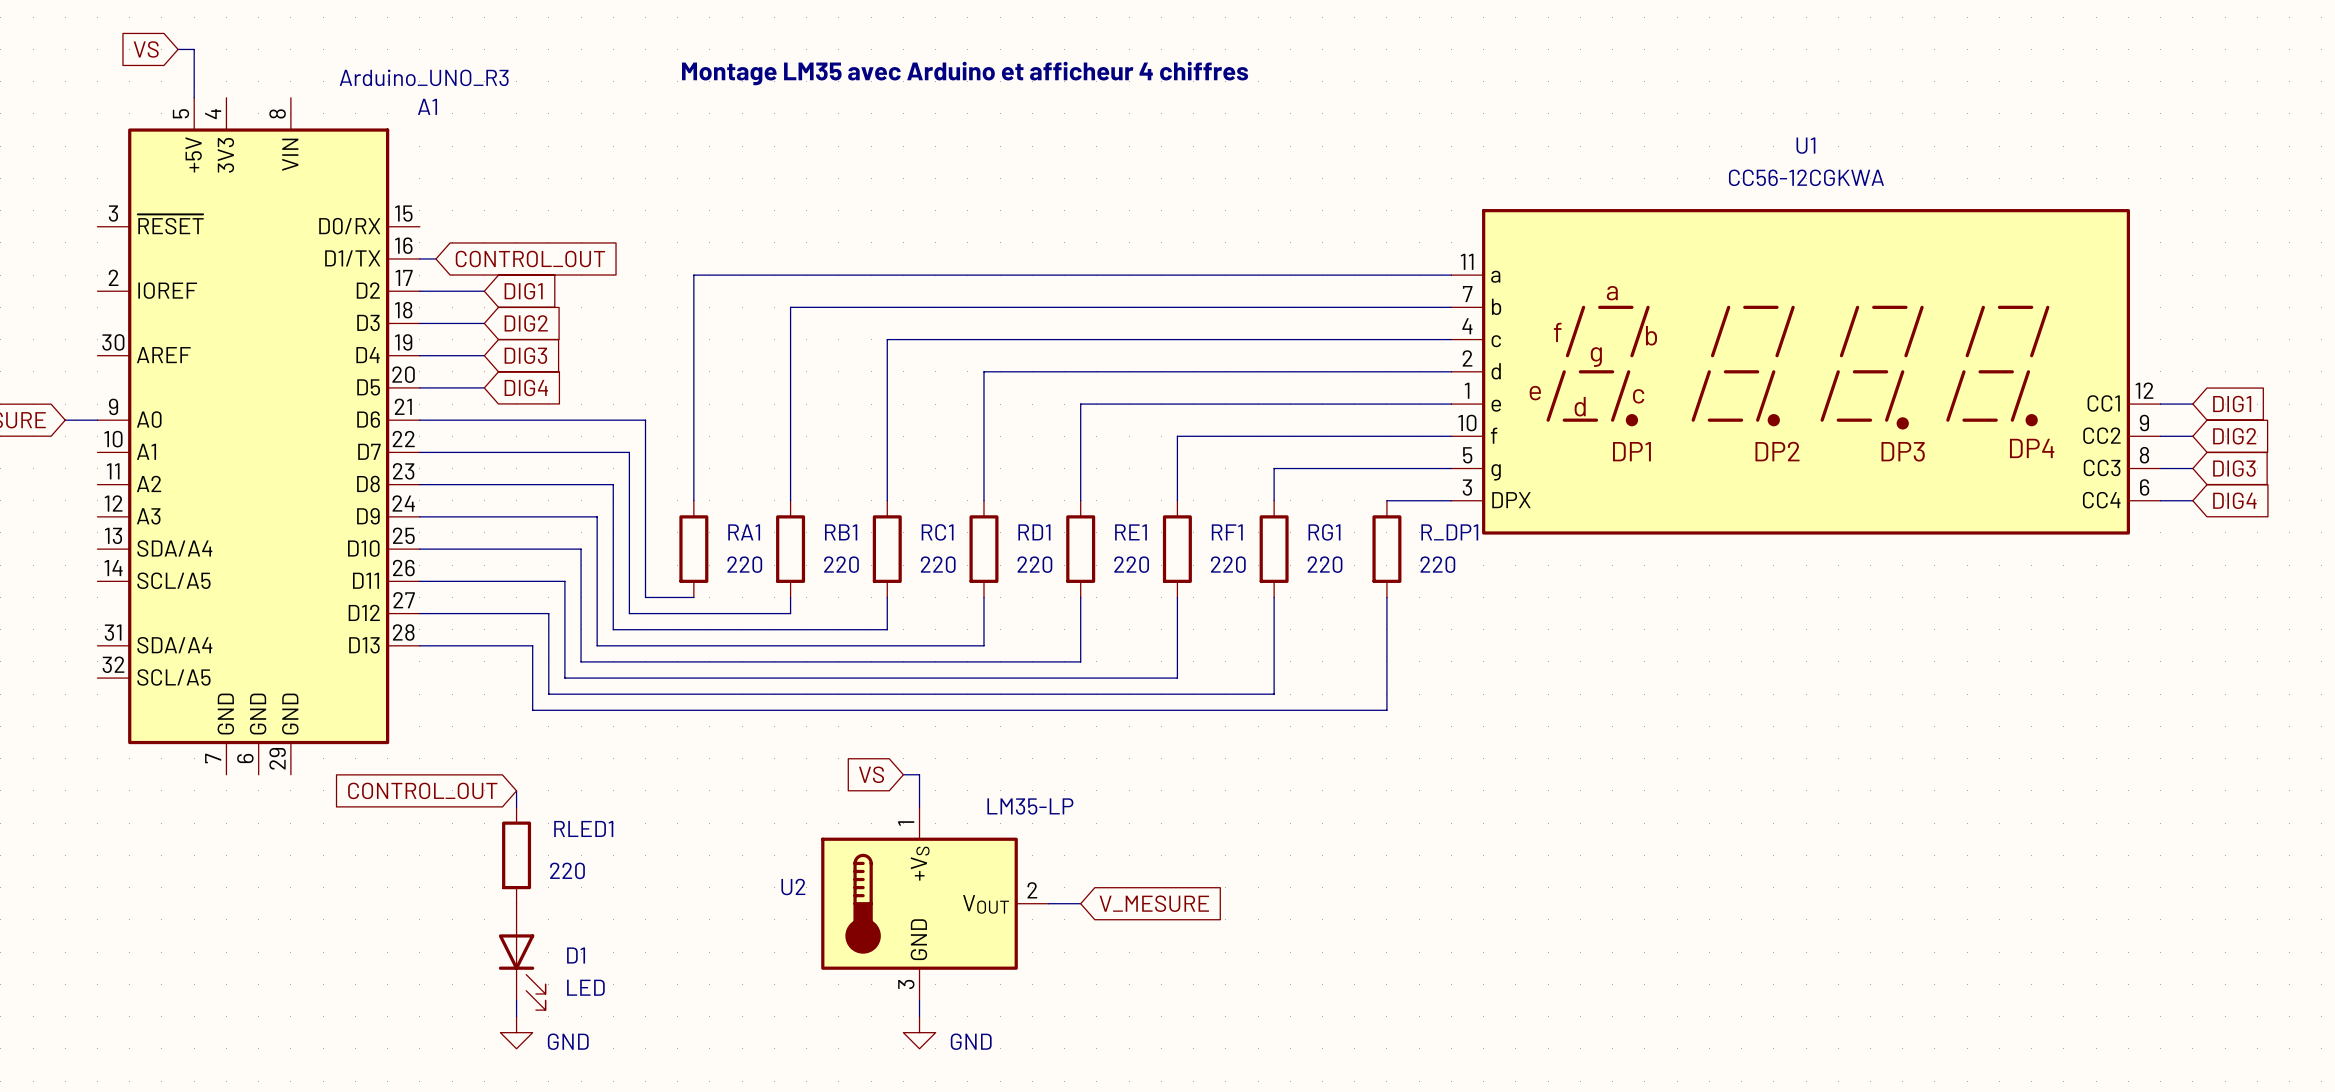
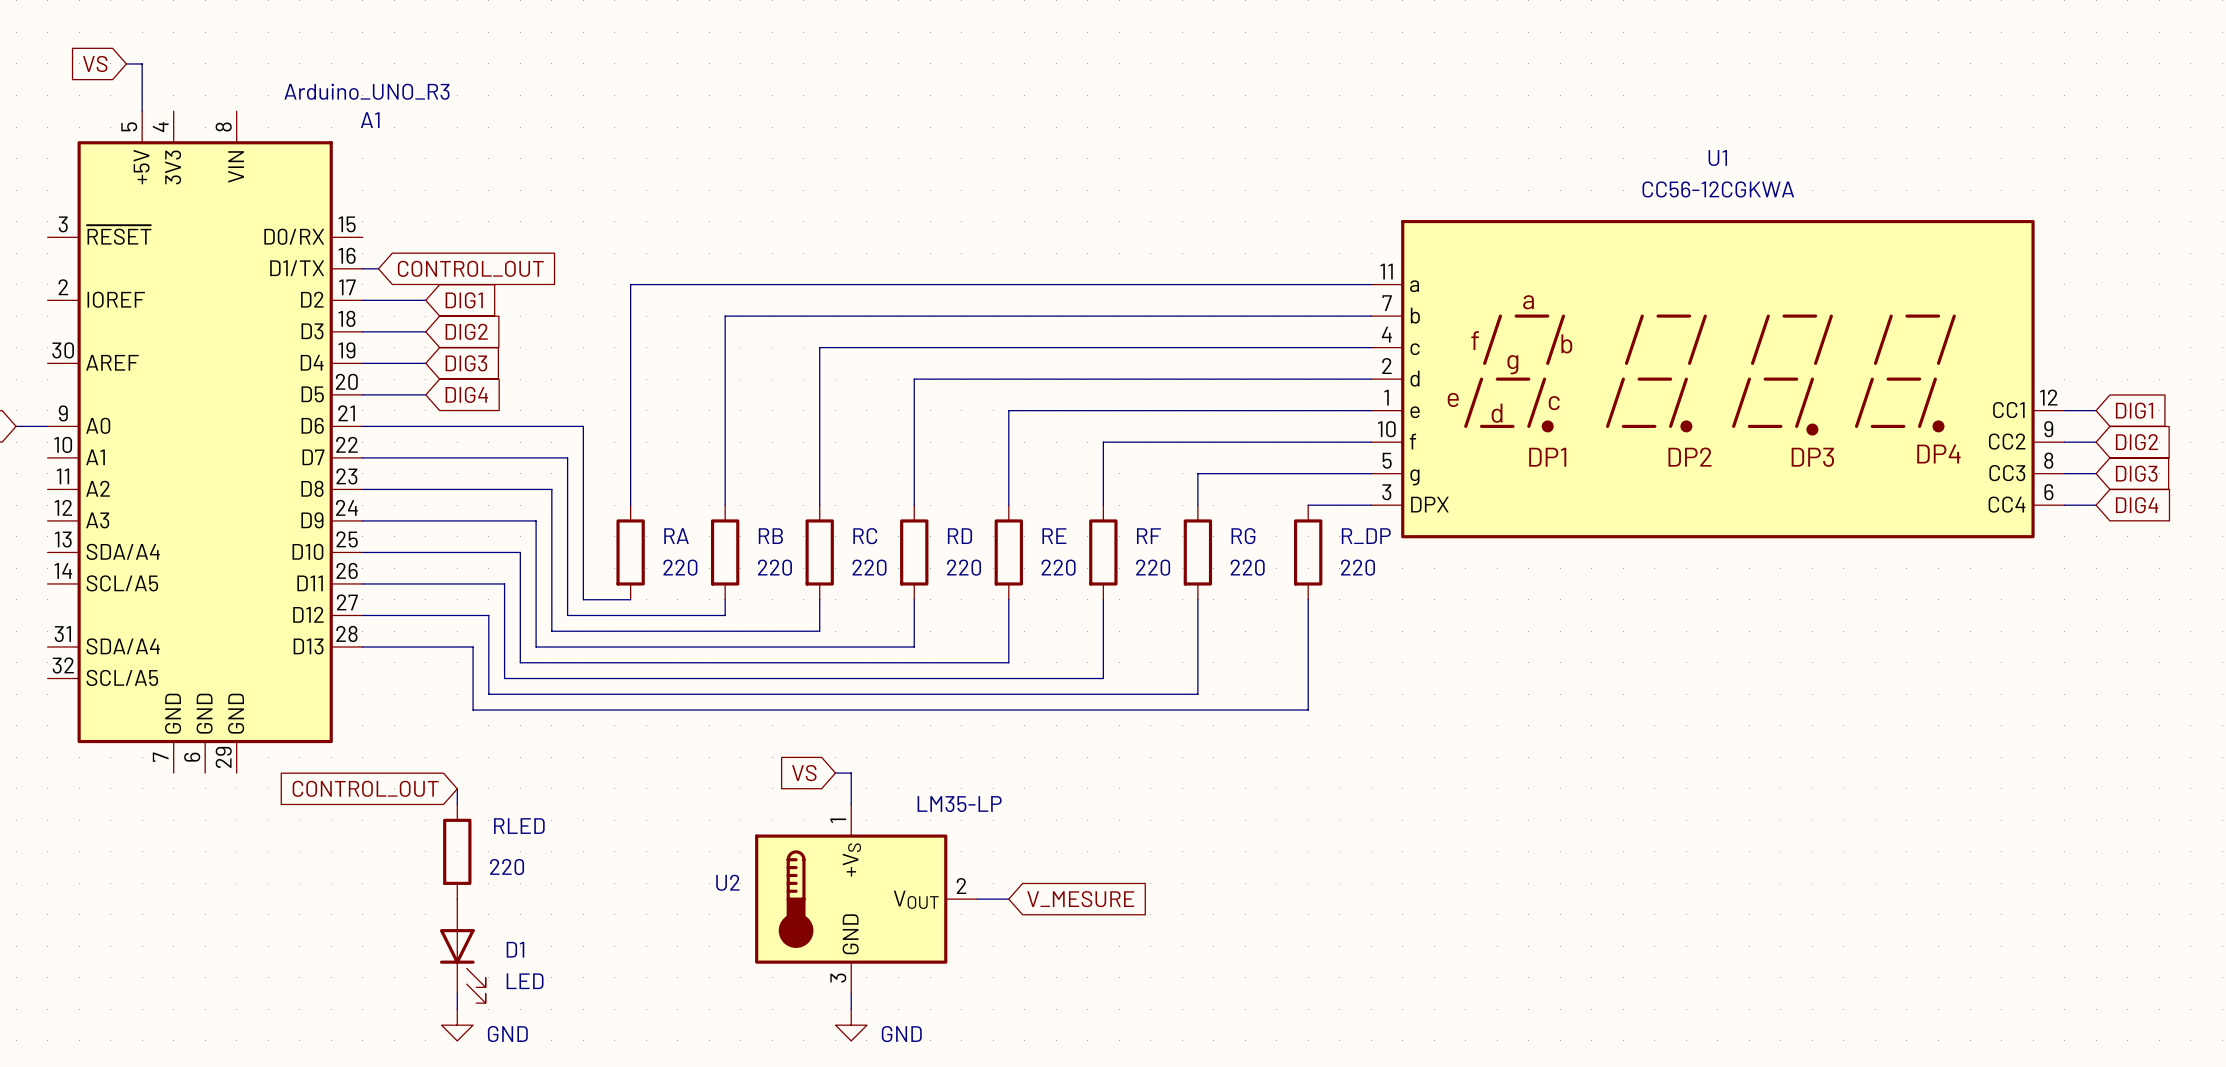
text: Montage LM35 avec Arduino et afficheur 4 chiffres (965, 73) -> none
RA1 name: RA1 (744, 532) -> RA (676, 536)
RB1 name: RB1 (841, 532) -> RB (770, 536)
RC1 name: RC1 (937, 532) -> RC (865, 536)
RD1 name: RD1 (1034, 532) -> RD (959, 536)
RE1 name: RE1 (1130, 532) -> RE (1054, 536)
RF1 name: RF1 (1227, 532) -> RF (1148, 536)
RG1 name: RG1 (1324, 532) -> RG (1243, 536)
R_DP1 name: R_DP1 (1449, 532) -> R_DP (1366, 536)
RLED1 name: RLED1 (583, 828) -> RLED (519, 826)

